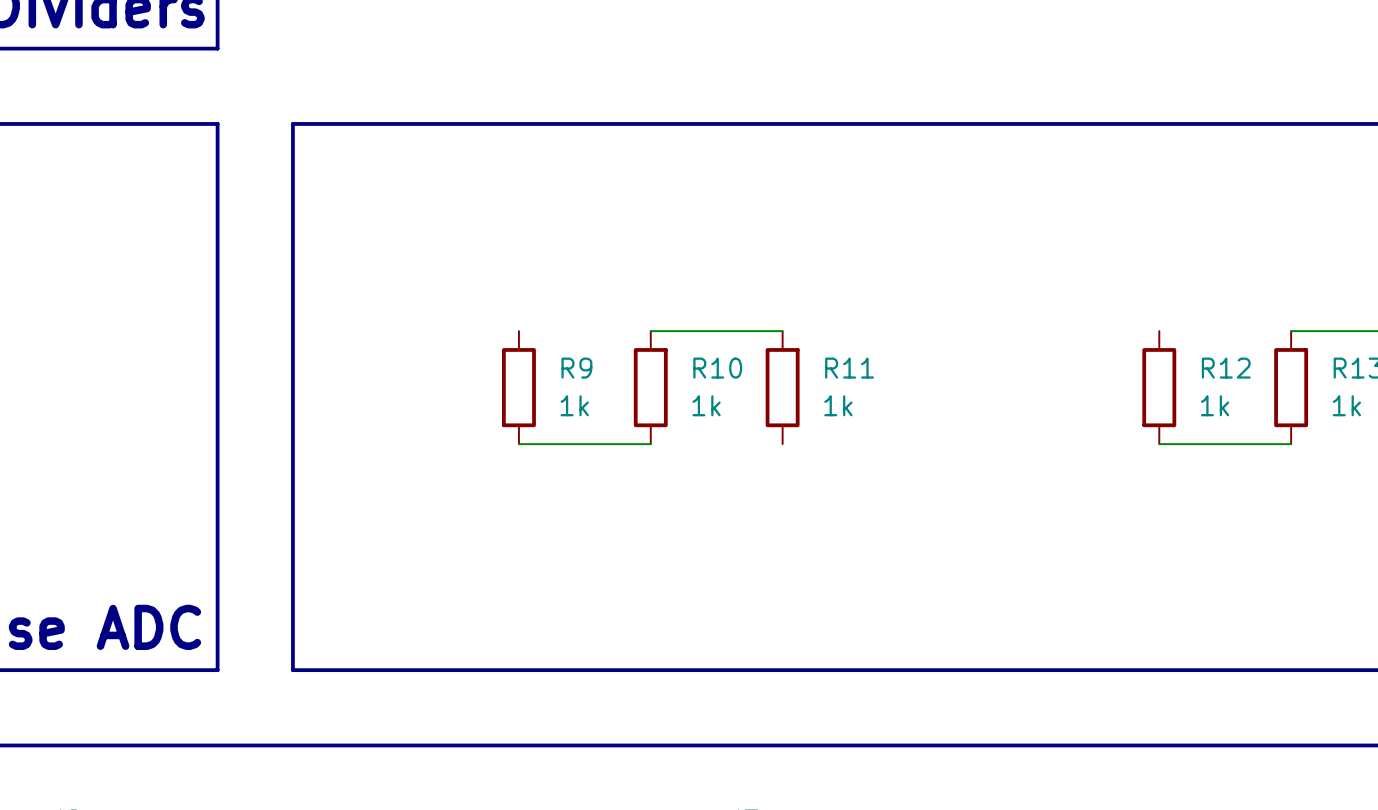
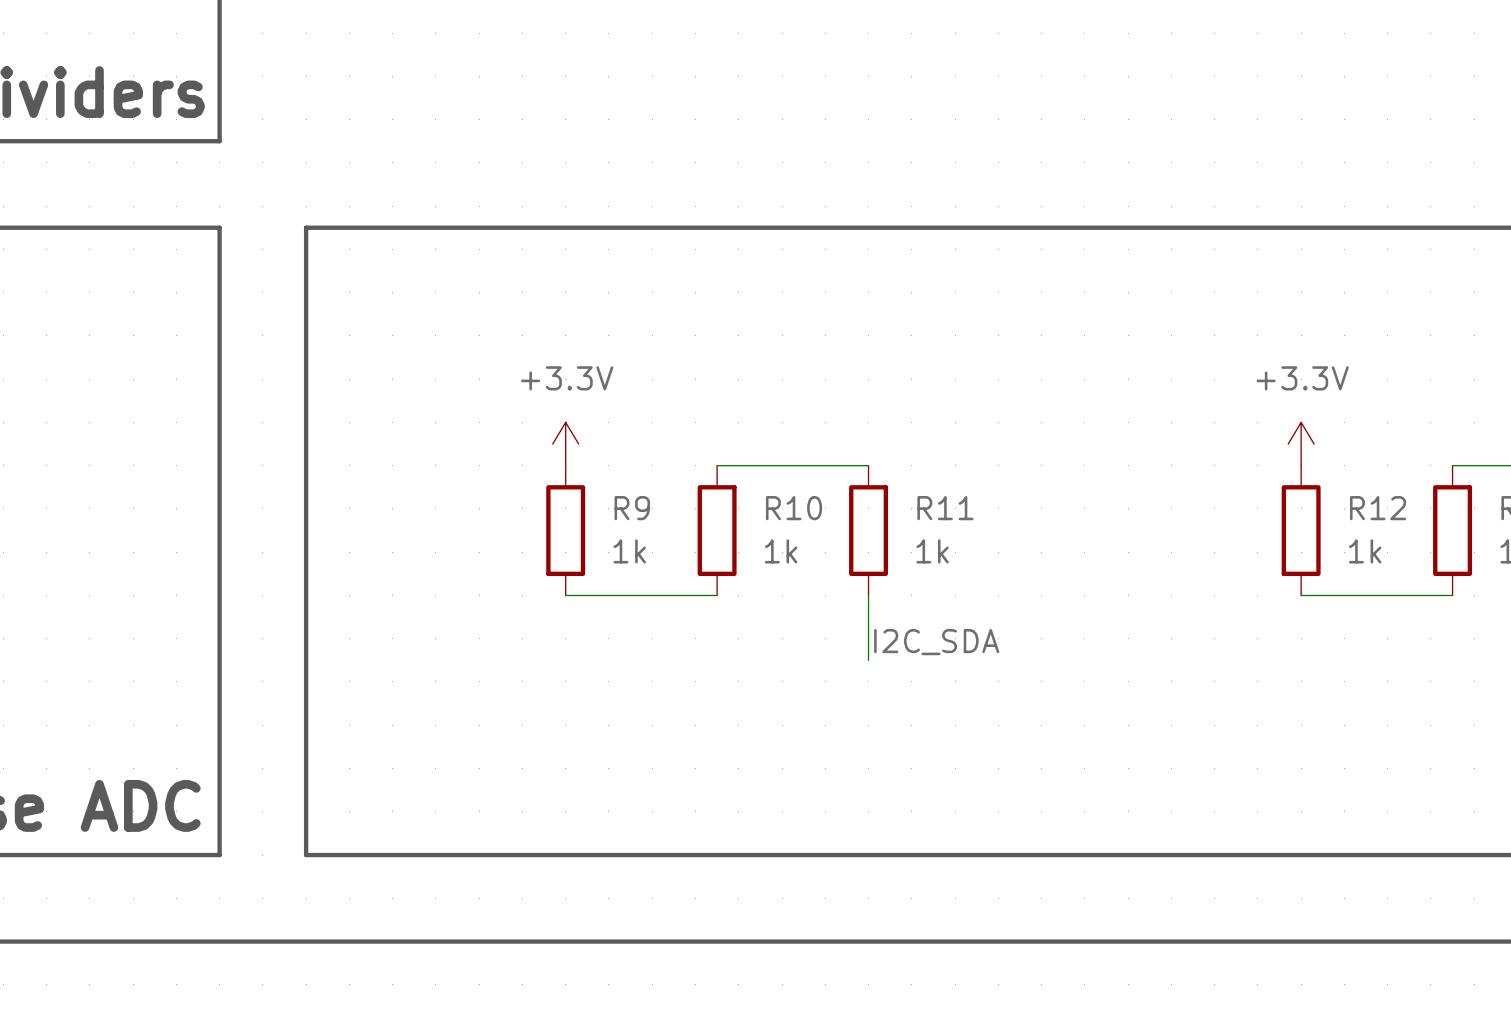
power symbol: none -> +3.3V (565, 444)
power symbol: none -> +3.3V (1301, 444)
wire: none -> (868, 595) (868, 660)
label: none -> I2C_SDA (936, 642)

